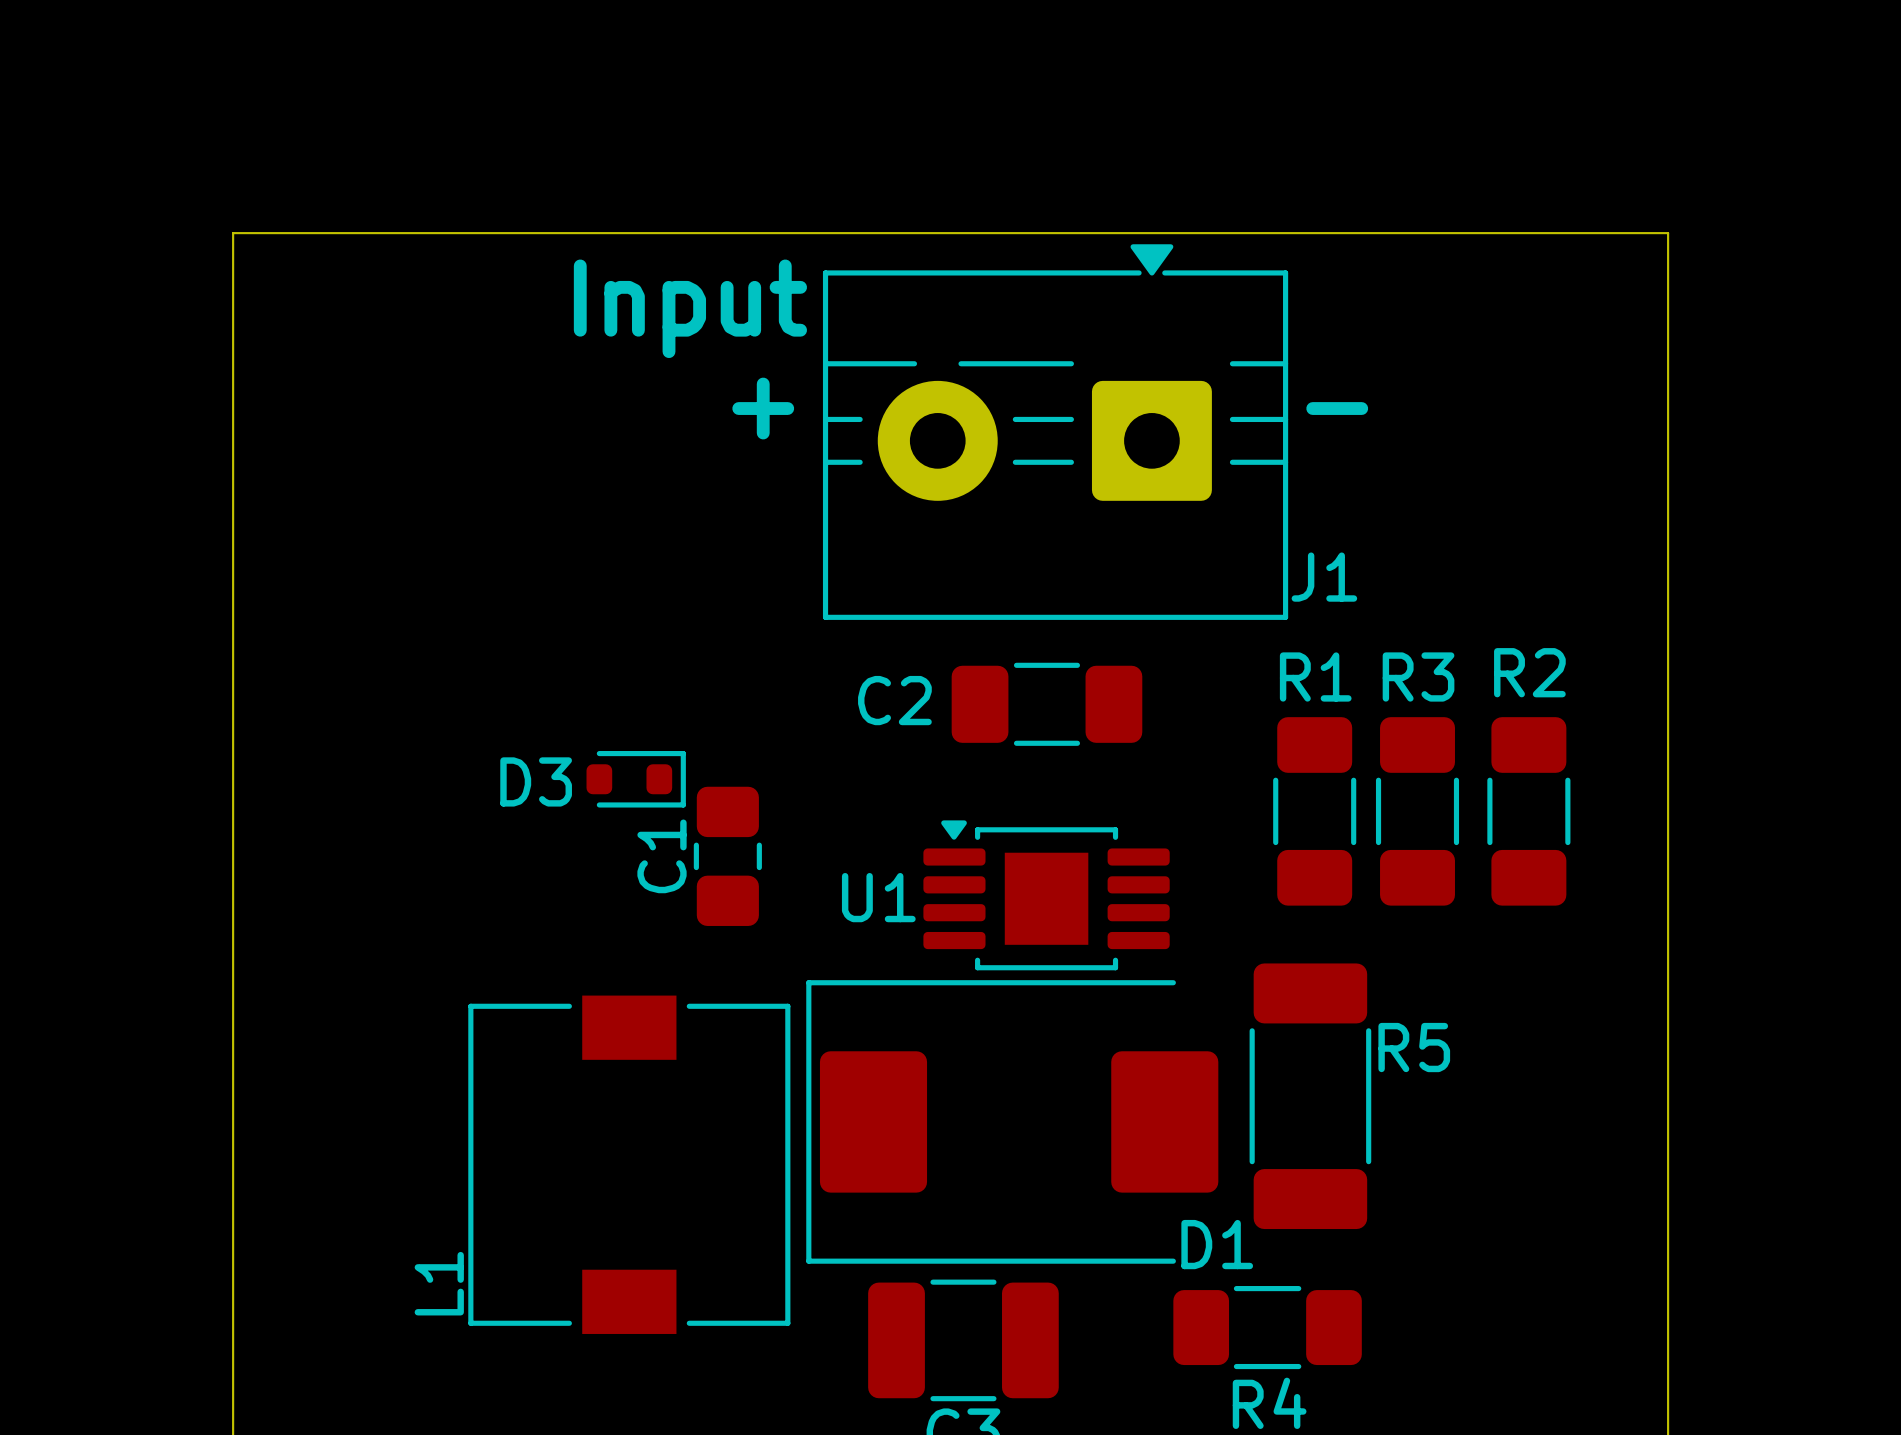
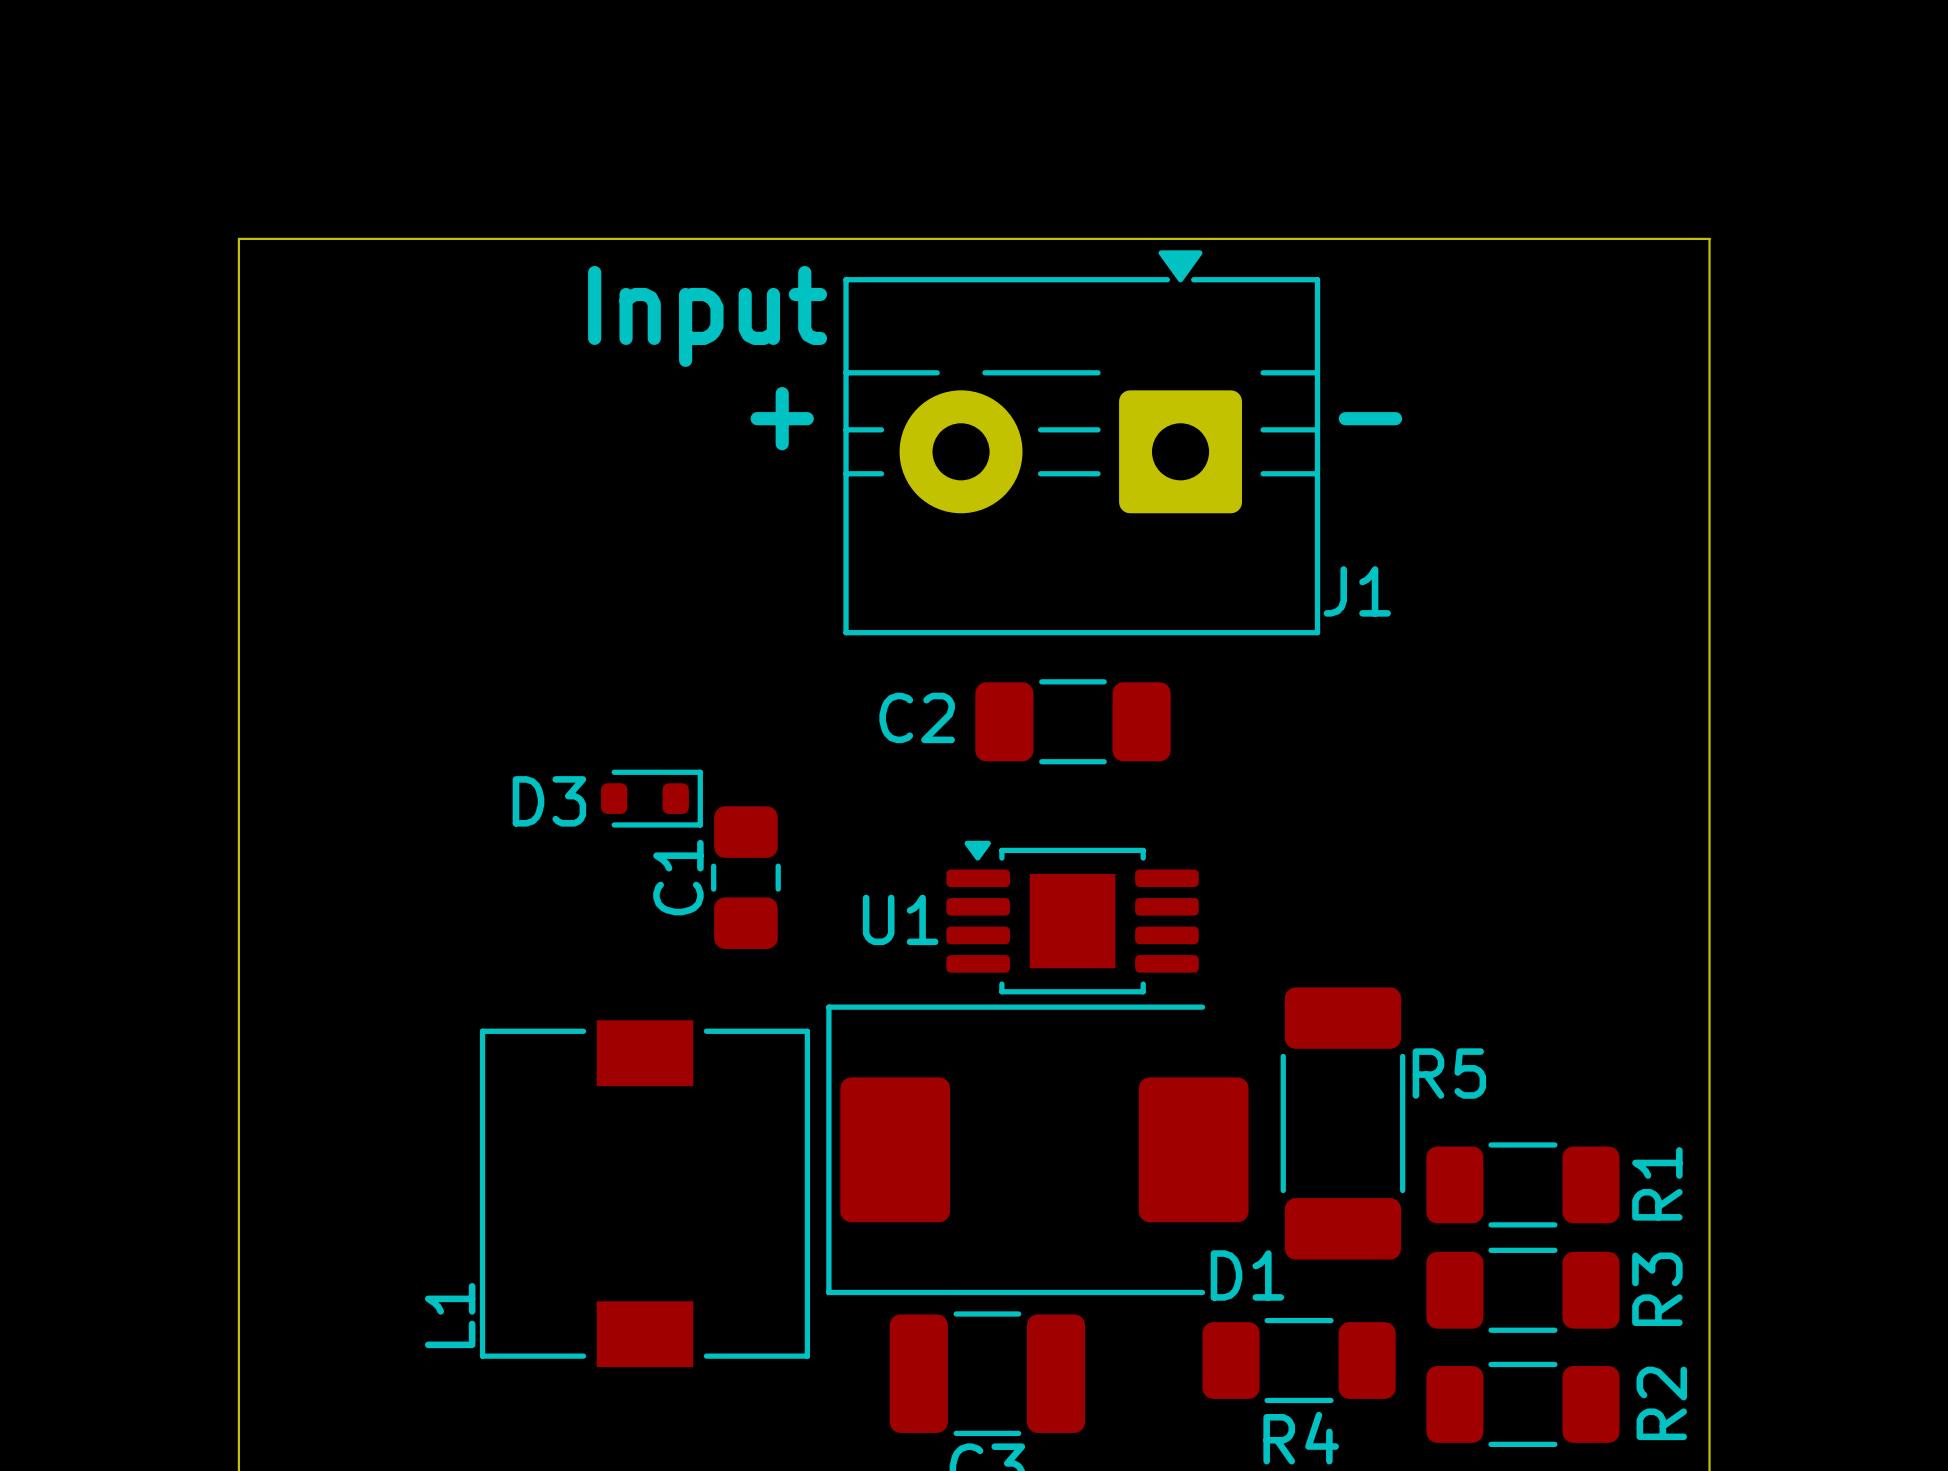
R1 rotation: 0° (1314, 811) -> 90° clockwise (1522, 1184)
R1 position: (1314, 811) -> (1522, 1184)
R3 rotation: 0° (1417, 811) -> 90° clockwise (1522, 1290)
R3 position: (1417, 811) -> (1522, 1290)
R2 rotation: 0° (1528, 811) -> 90° clockwise (1522, 1404)
R2 position: (1528, 811) -> (1522, 1404)

